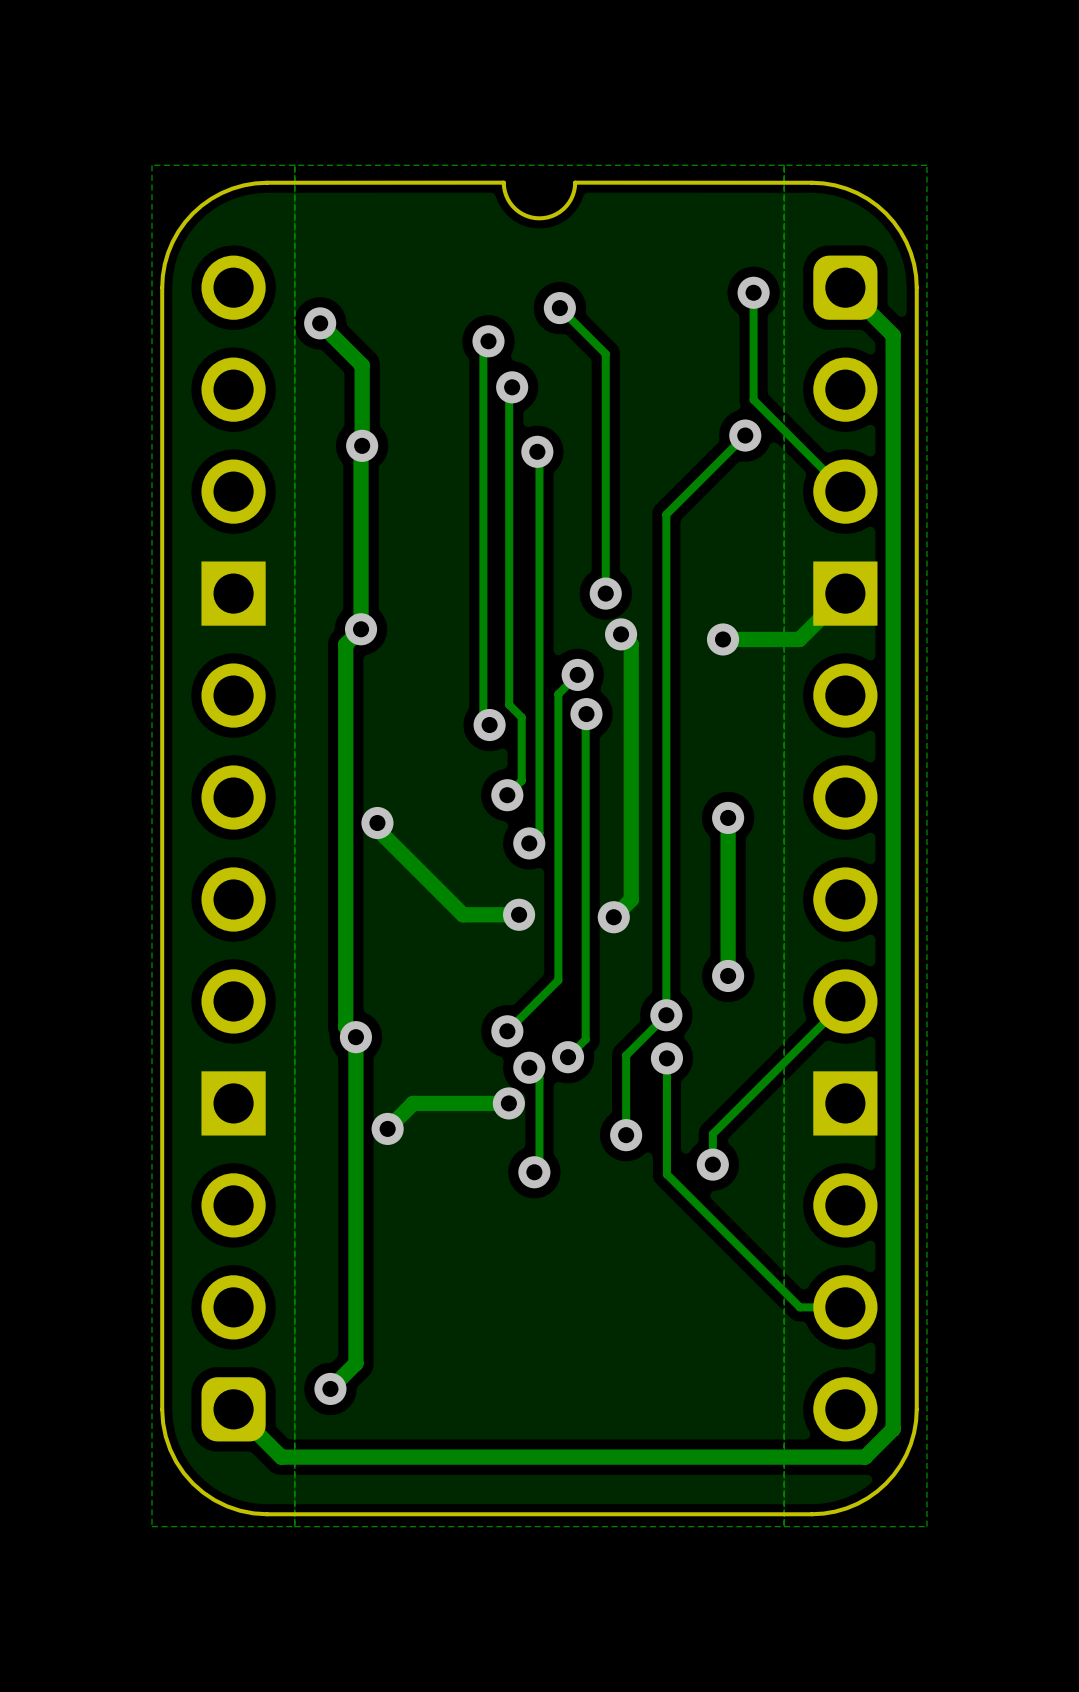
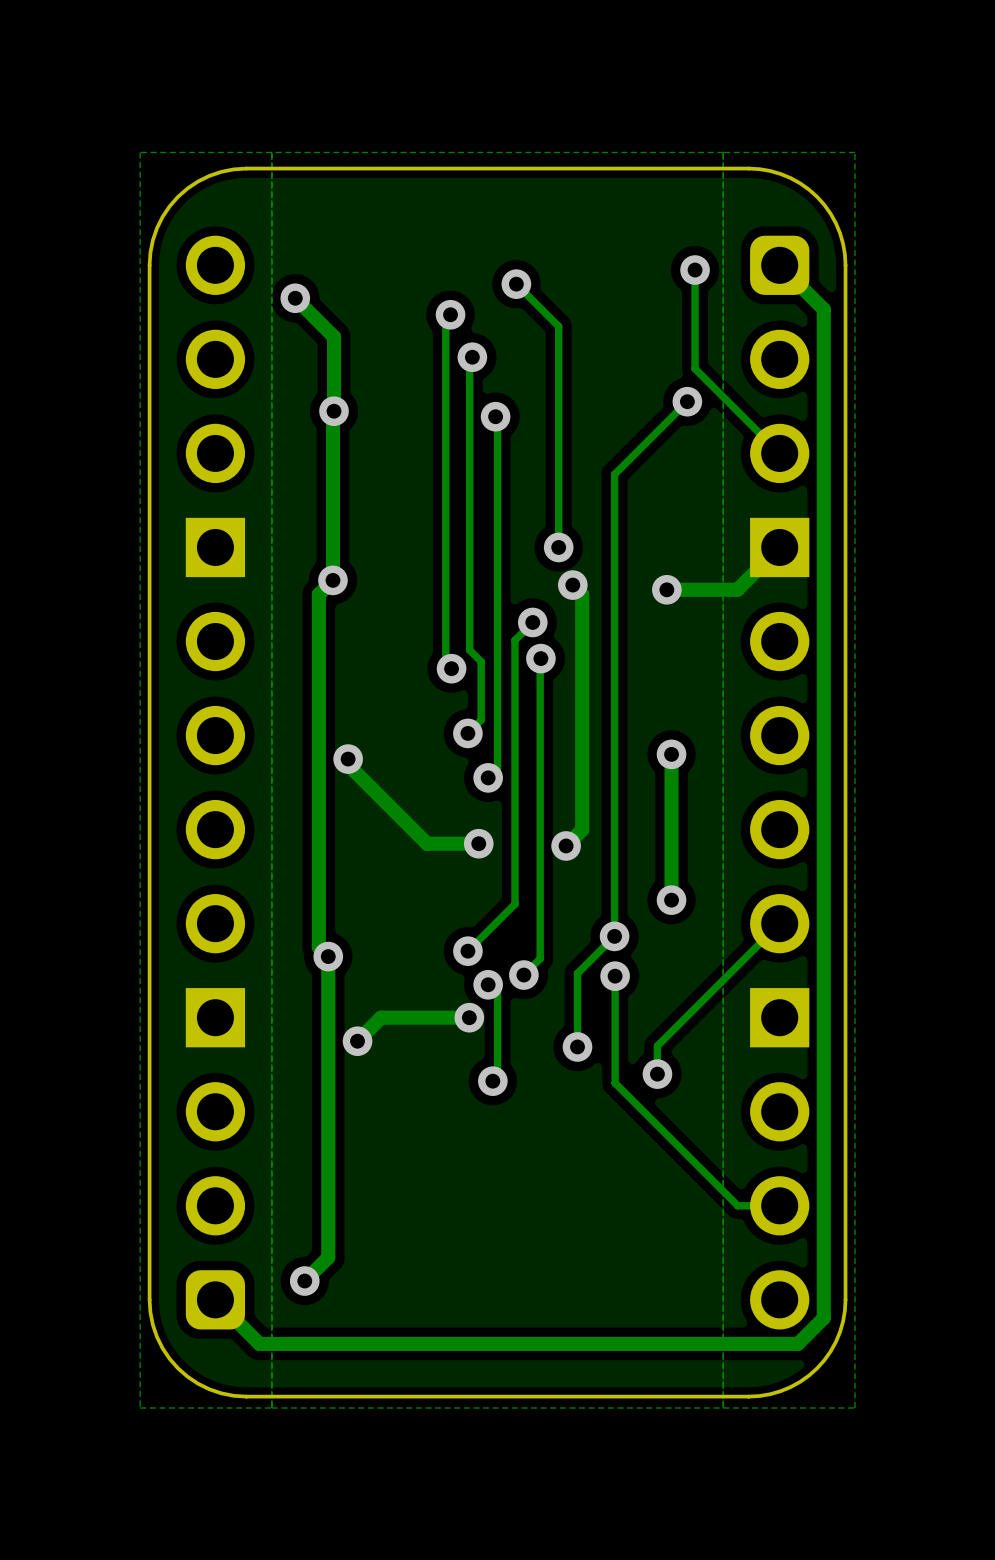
part footprint: [160, 180, 919, 1517] -> [147, 166, 848, 1399]

